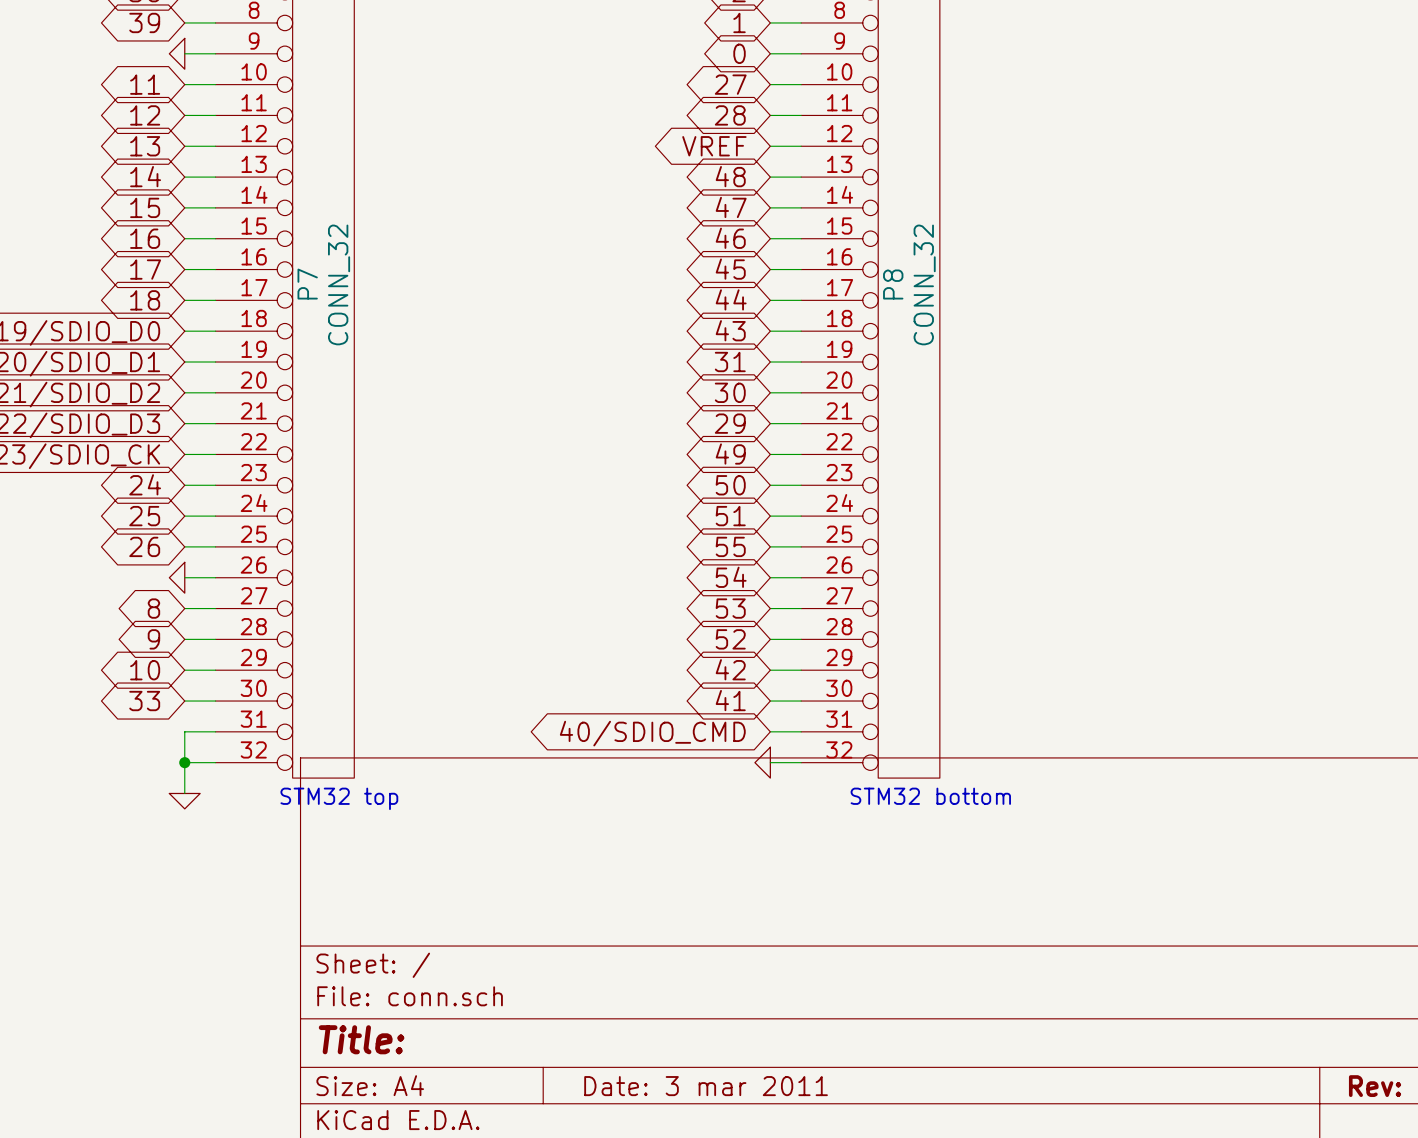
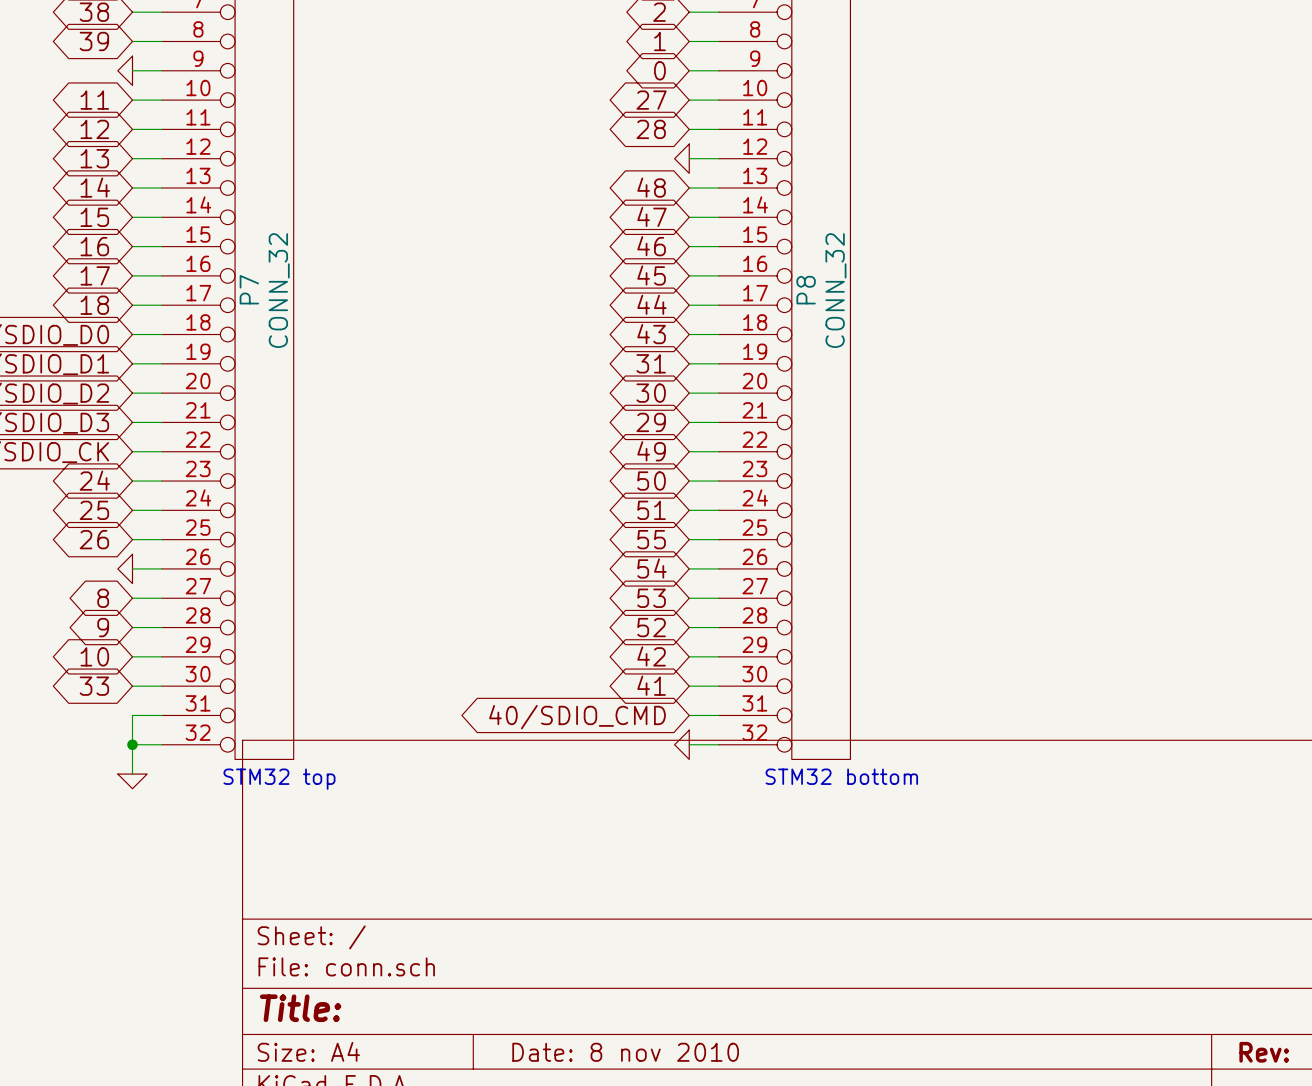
global label: VREF (714, 146) -> none
power symbol: none -> (681, 158)
title block: Date: 3 mar 2011 (706, 1086) -> Date: 8 nov 2010 (625, 1052)

